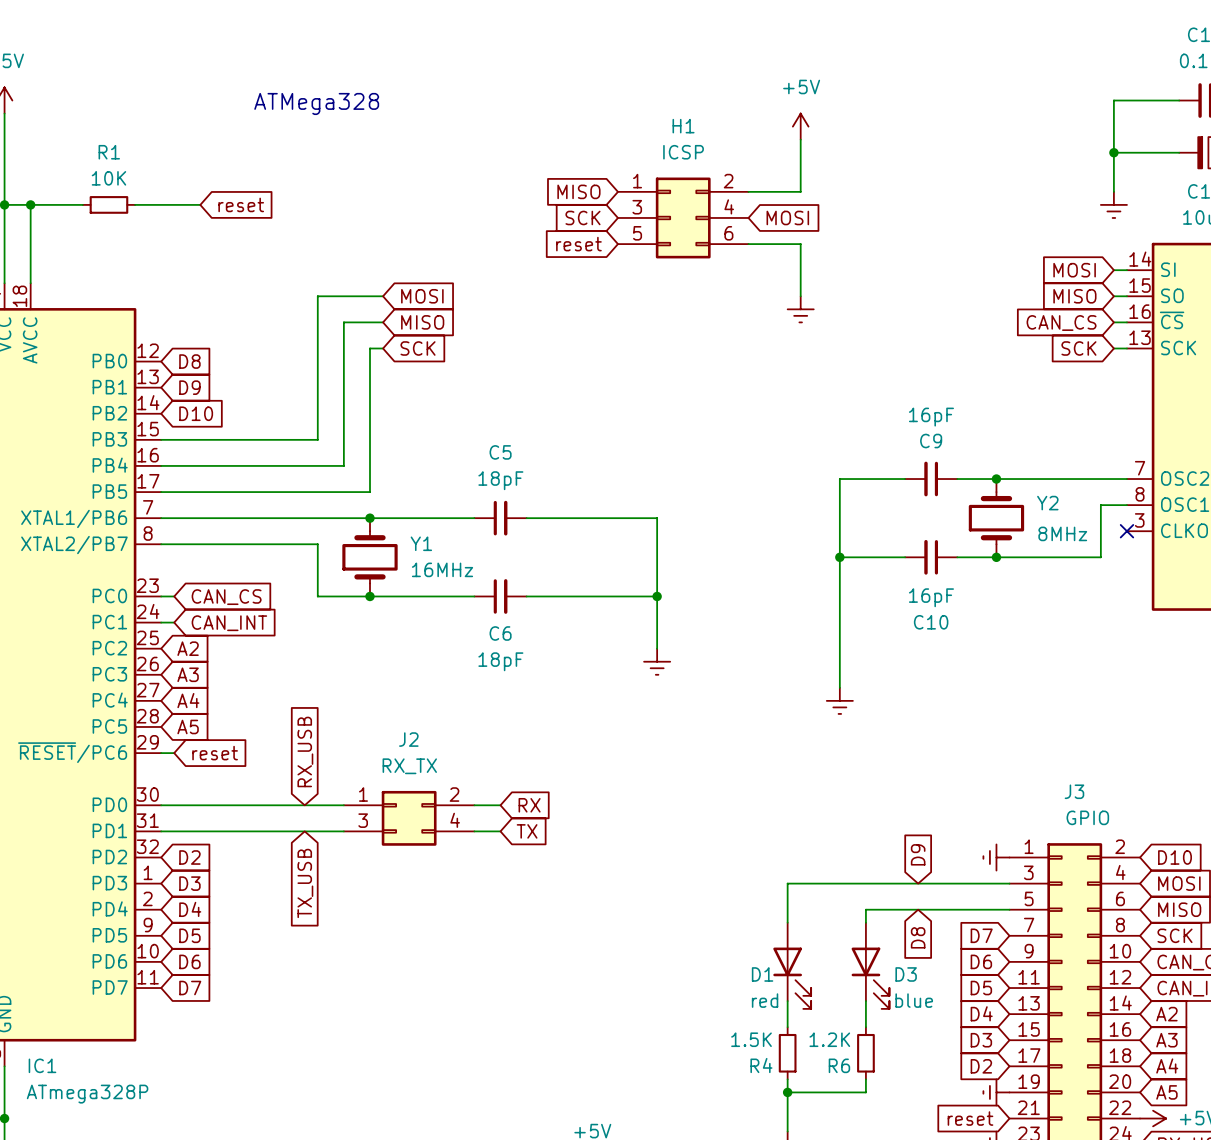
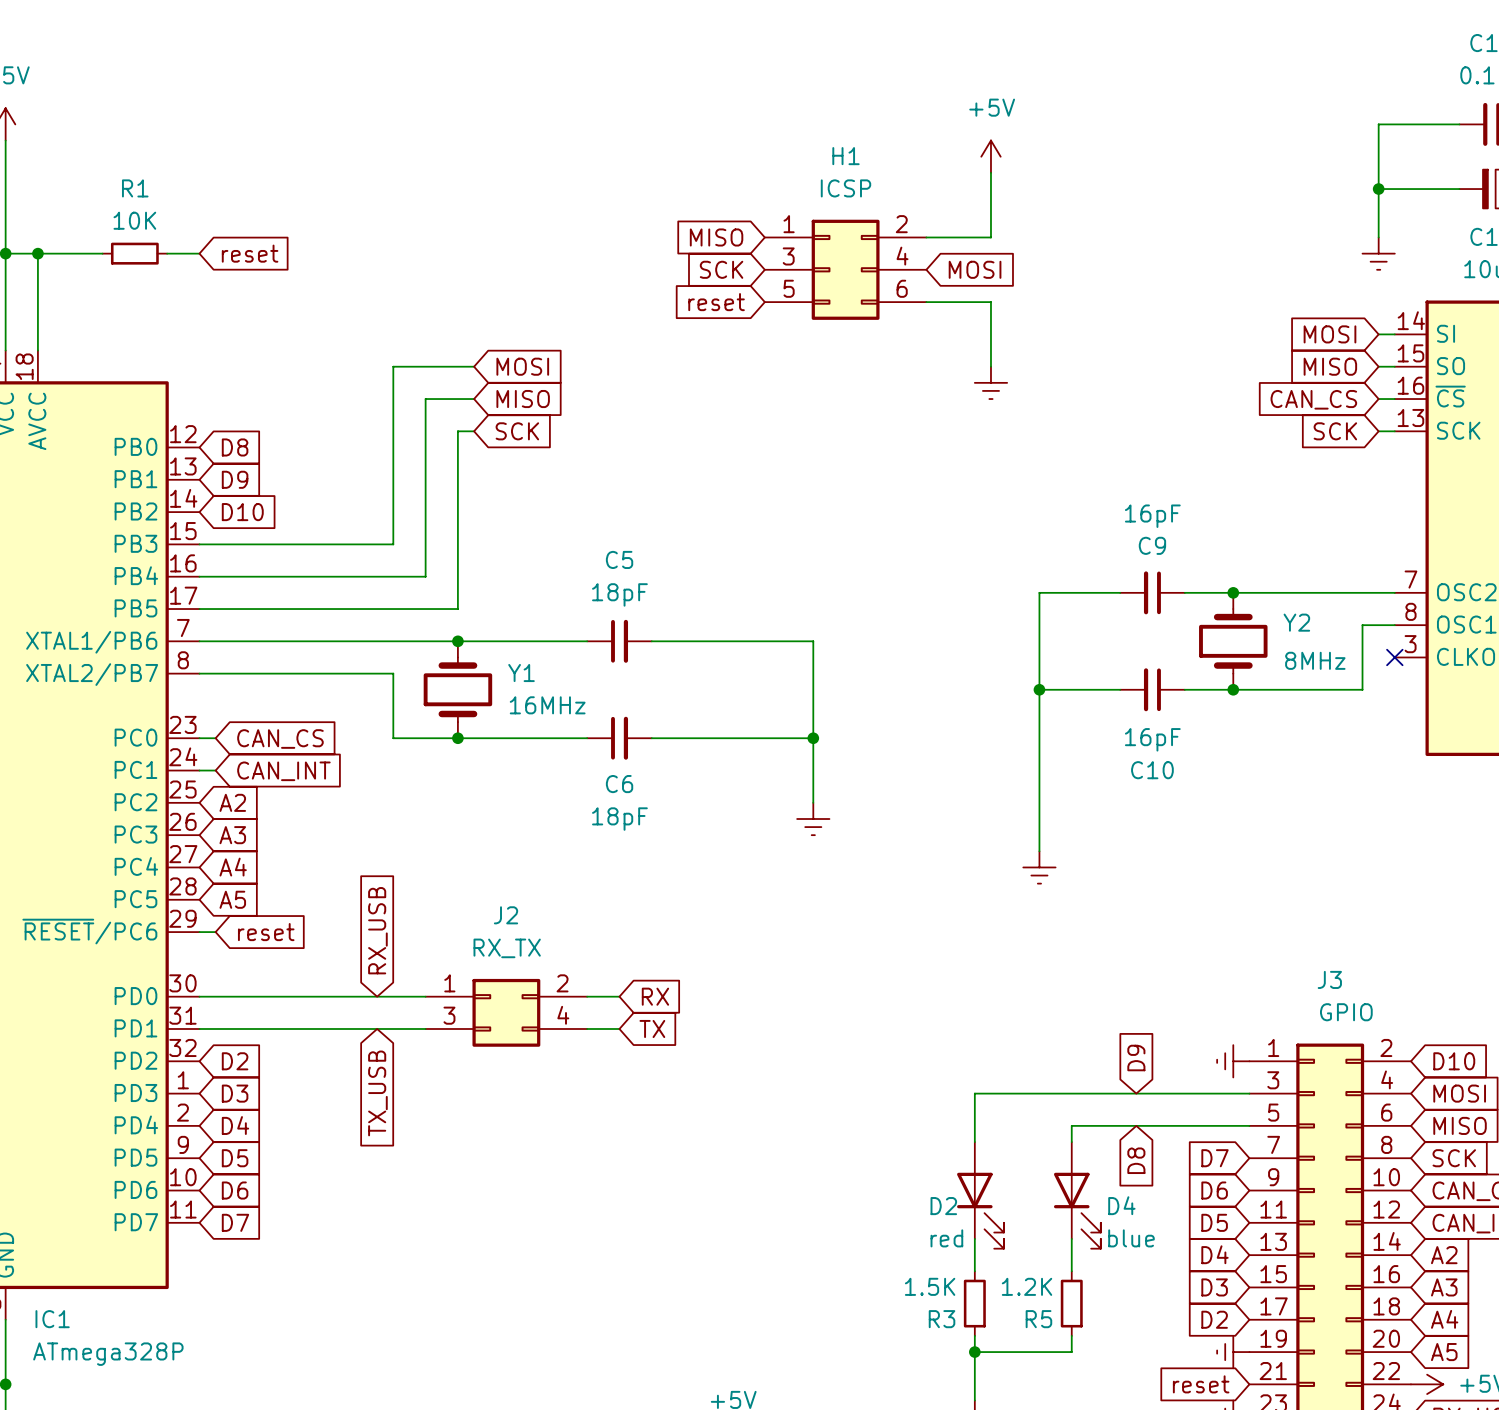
text: ATMega328 (316, 103) -> none
wire: (161, 204) (200, 204) -> none
global label position: reset (241, 204) -> reset (250, 253)
D1 name: D1 (762, 974) -> D2 (943, 1206)
D3 name: D3 (906, 974) -> D4 (1121, 1205)
R4 name: R4 (761, 1065) -> R3 (942, 1319)
R6 name: R6 (839, 1065) -> R5 (1038, 1319)

